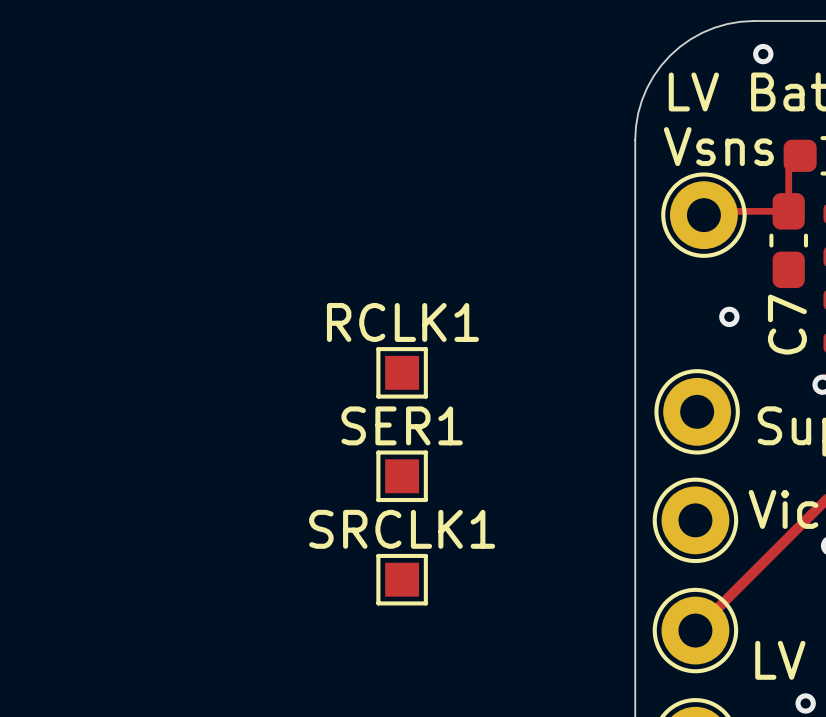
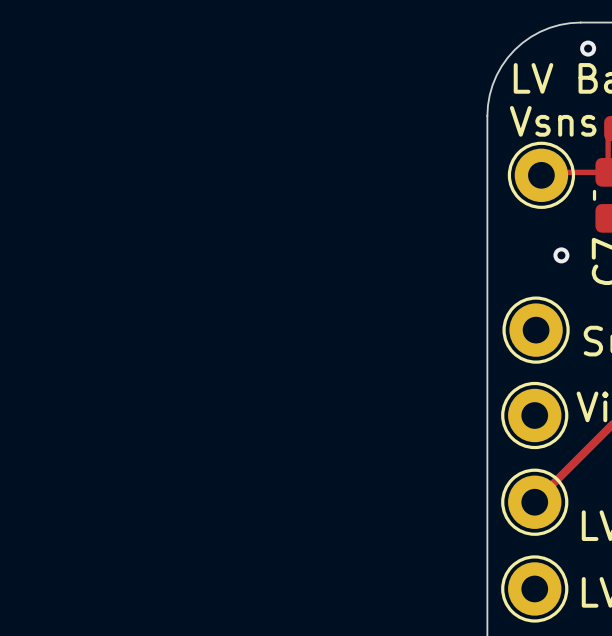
RCLK1: (402, 372) -> none
SER1: (402, 476) -> none
SRCLK1: (402, 579) -> none

